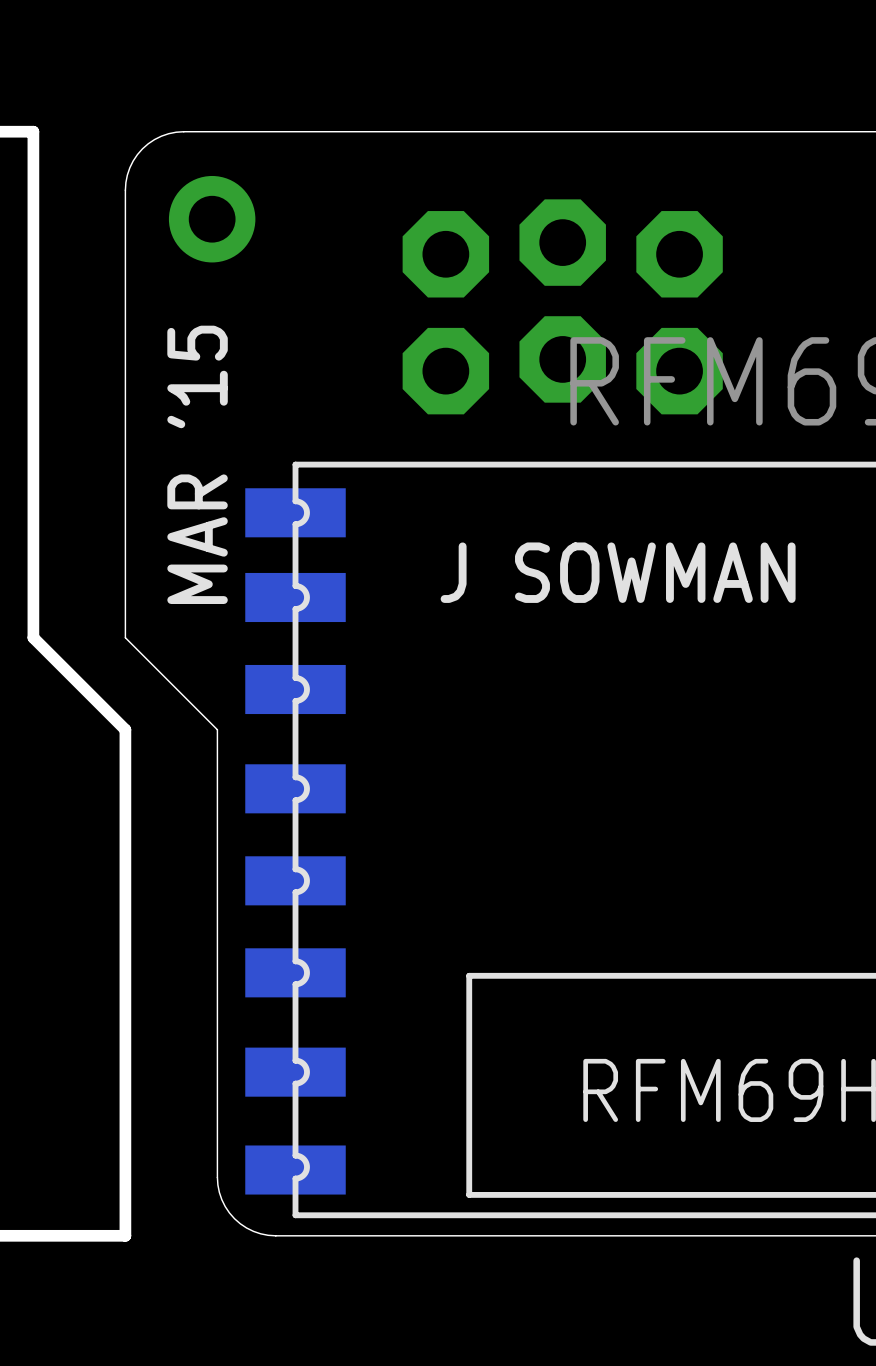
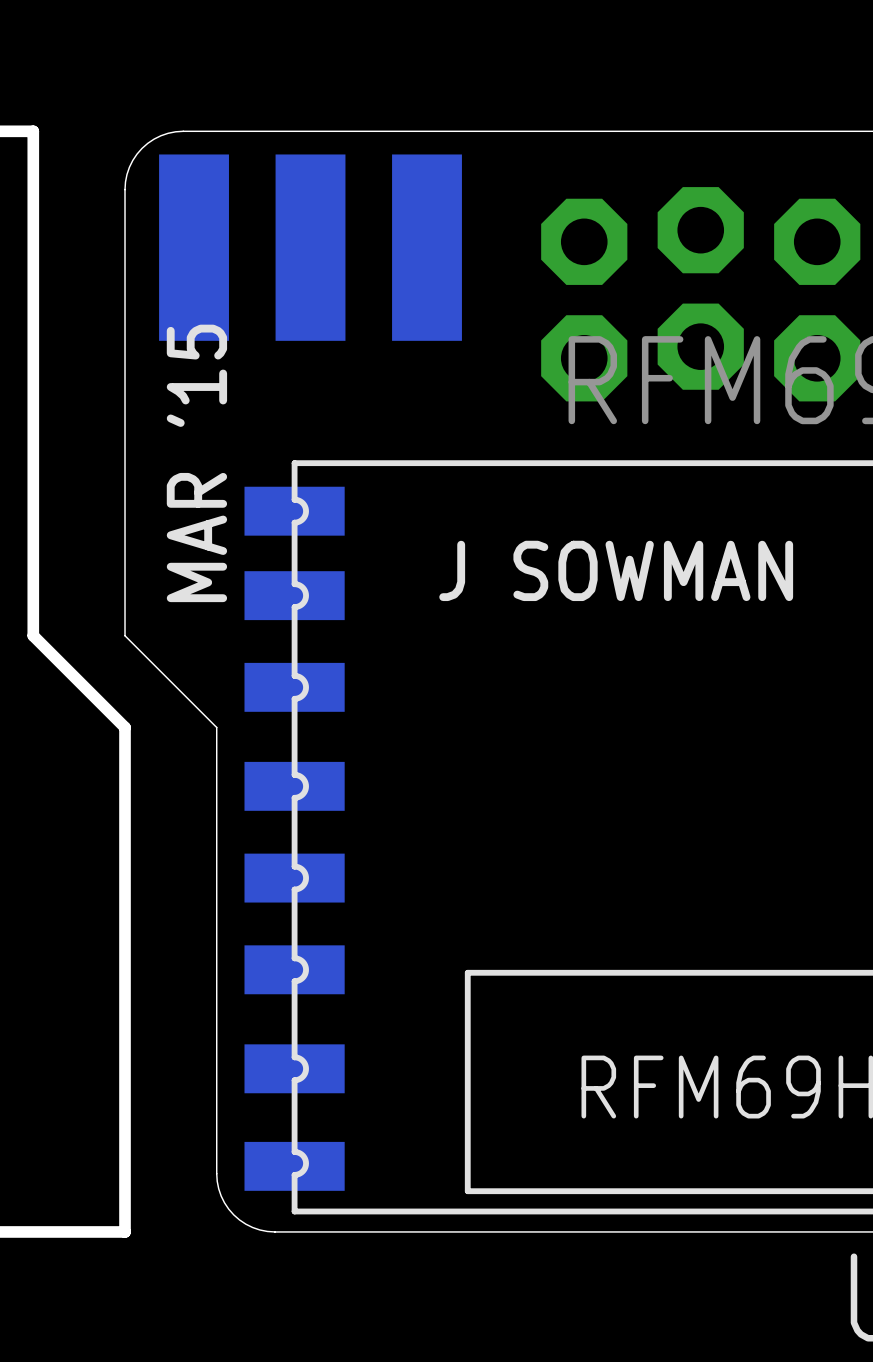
part: (212, 219) -> none
part: none -> (310, 247)
part position: (562, 306) -> (700, 294)

